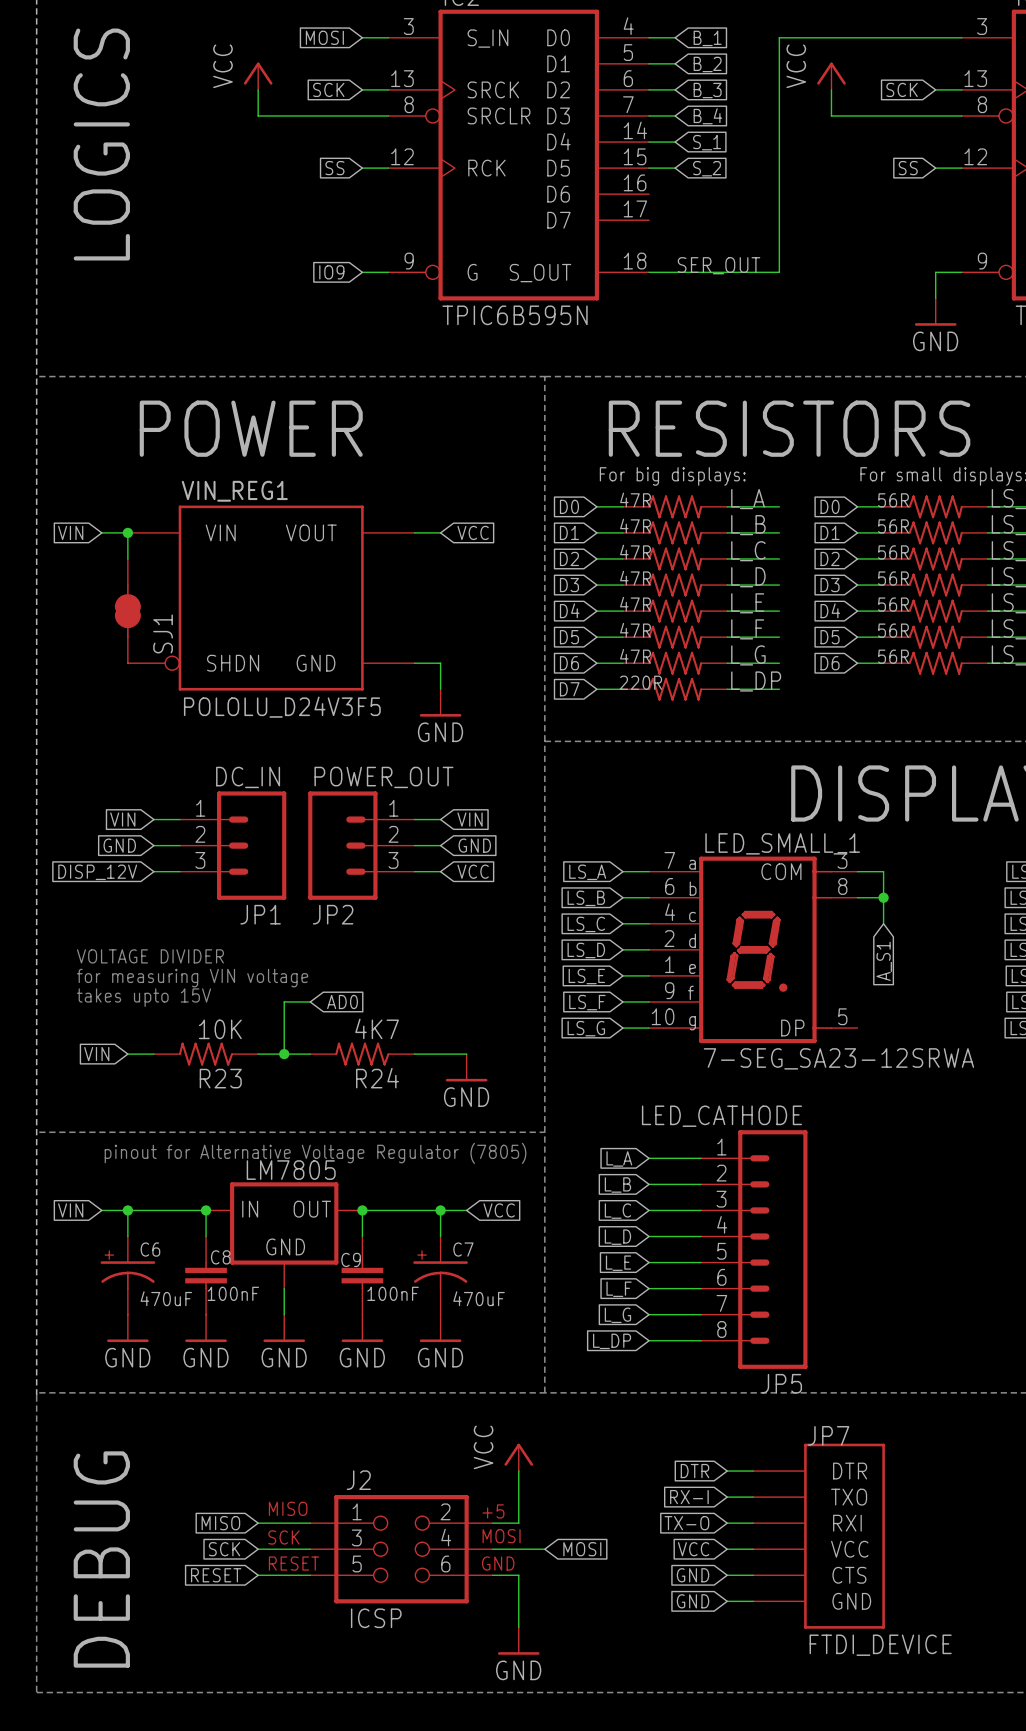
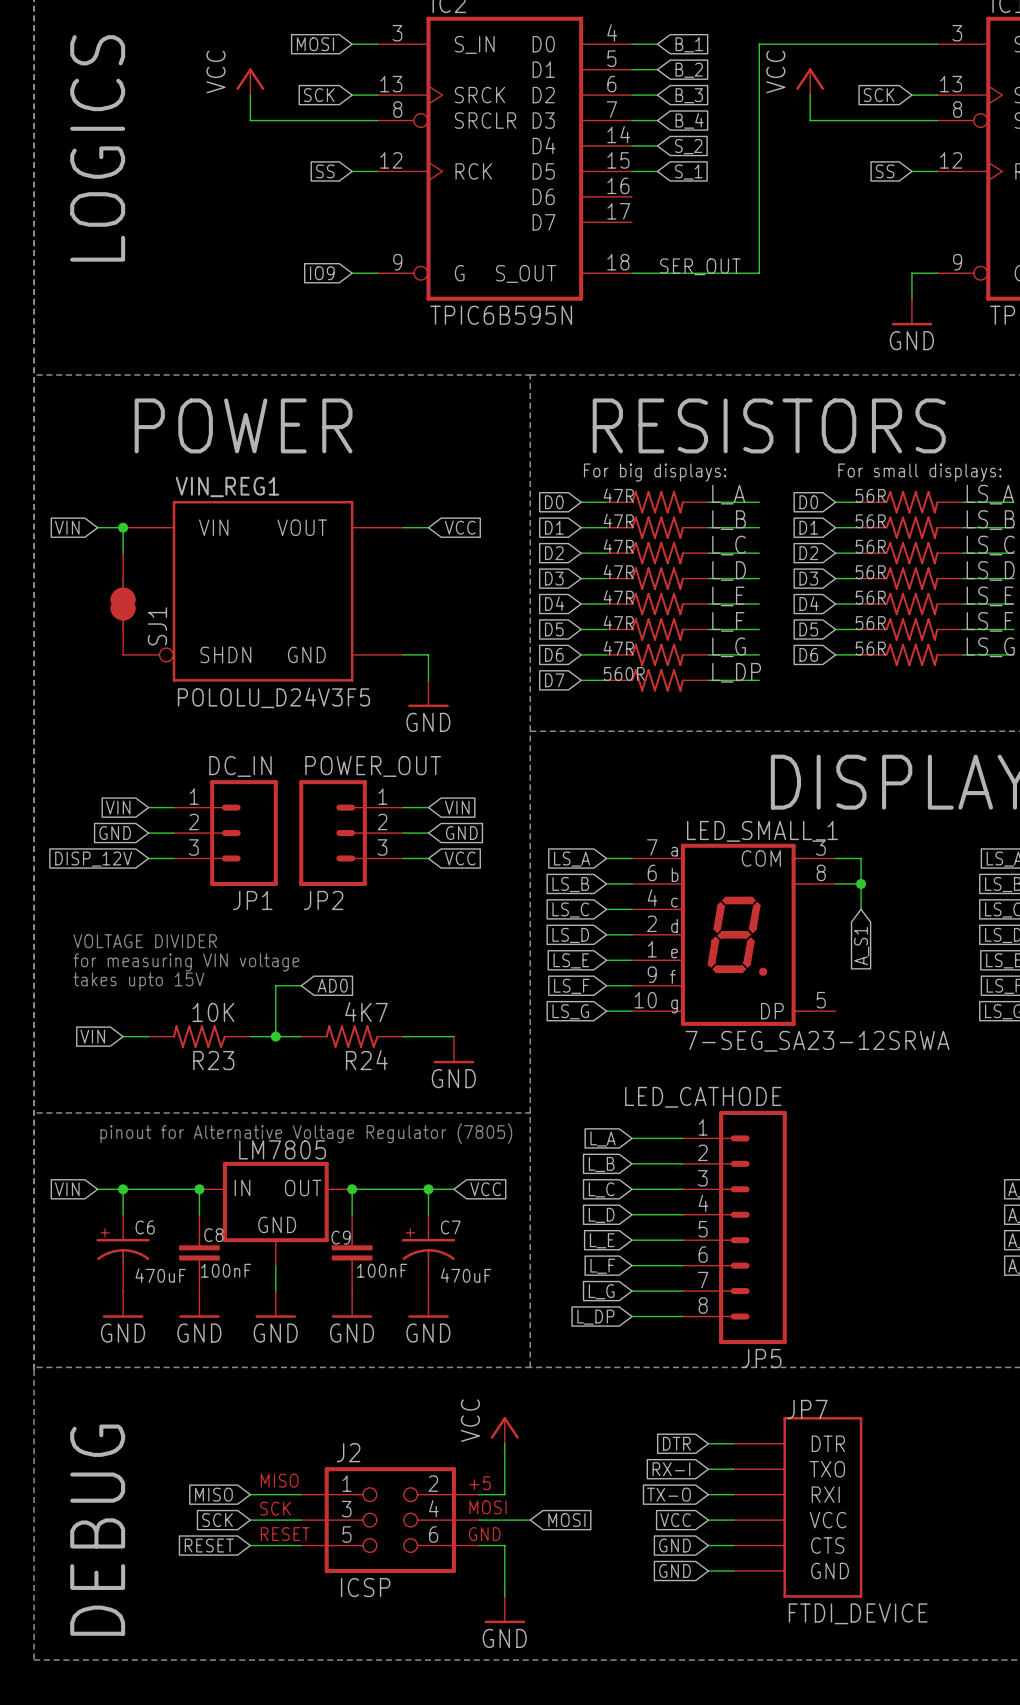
global label: S_1 (707, 142) -> S_2 (688, 146)
global label: S_2 (707, 168) -> S_1 (688, 172)
part value: 220R (640, 682) -> 560R (624, 674)

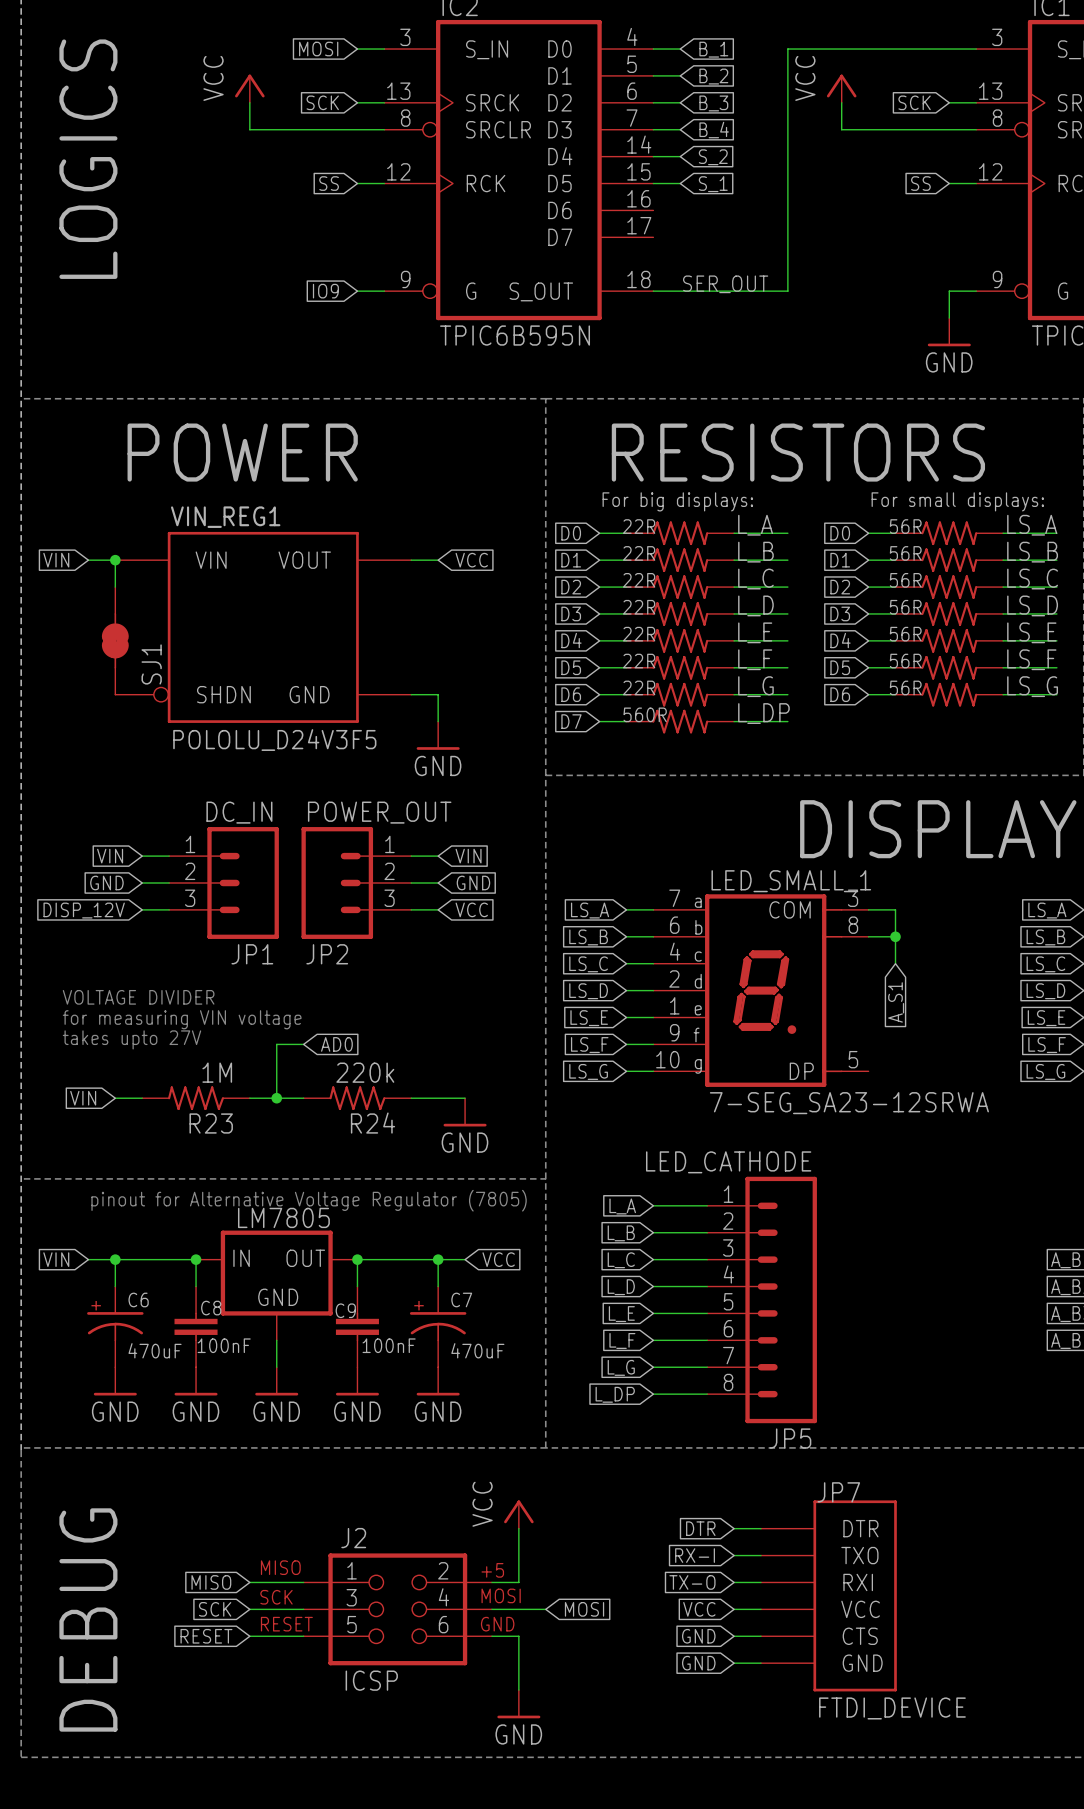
part value: 47R (618, 495) -> 22R (639, 526)
part value: 47R (618, 521) -> 22R (639, 553)
part value: 47R (618, 546) -> 22R (639, 580)
part value: 47R (618, 571) -> 22R (639, 607)
part value: 47R (618, 597) -> 22R (639, 634)
part value: 47R (618, 622) -> 22R (639, 661)
part value: 47R (618, 648) -> 22R (639, 687)
text: takes upto 15V (138, 981) -> takes upto 27V (131, 1039)
R23 value: 10K (213, 1012) -> 1M (217, 1072)
R24 value: 4K7 (366, 1012) -> 220k (365, 1072)

